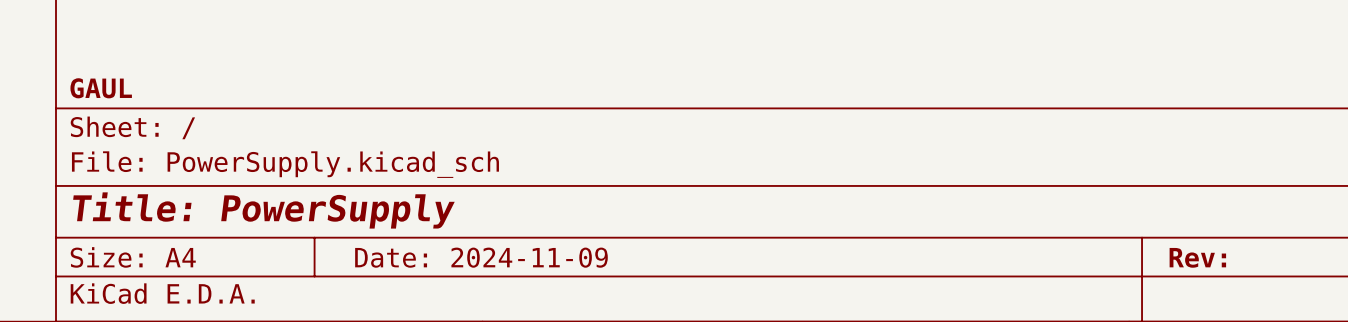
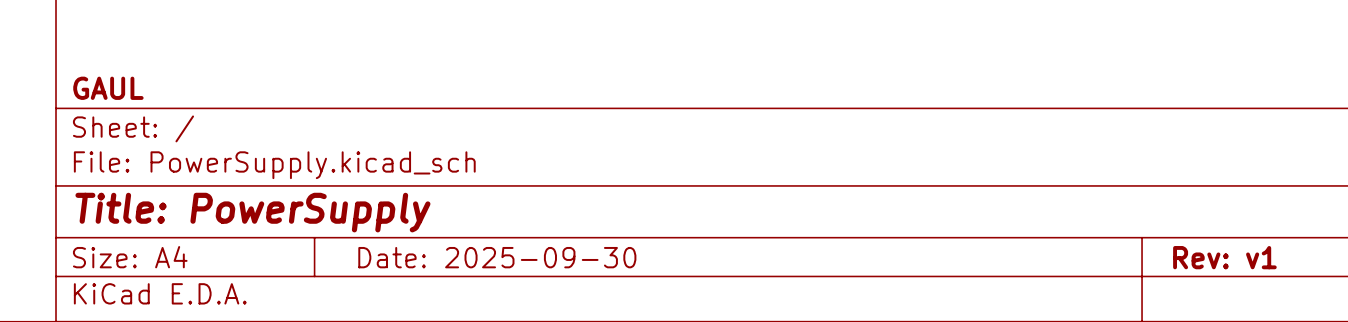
title block: Date: 2024-11-09 (481, 257) -> Date: 2025-09-30 (497, 257)
title block: Rev: (1197, 257) -> Rev: v1 (1224, 257)

